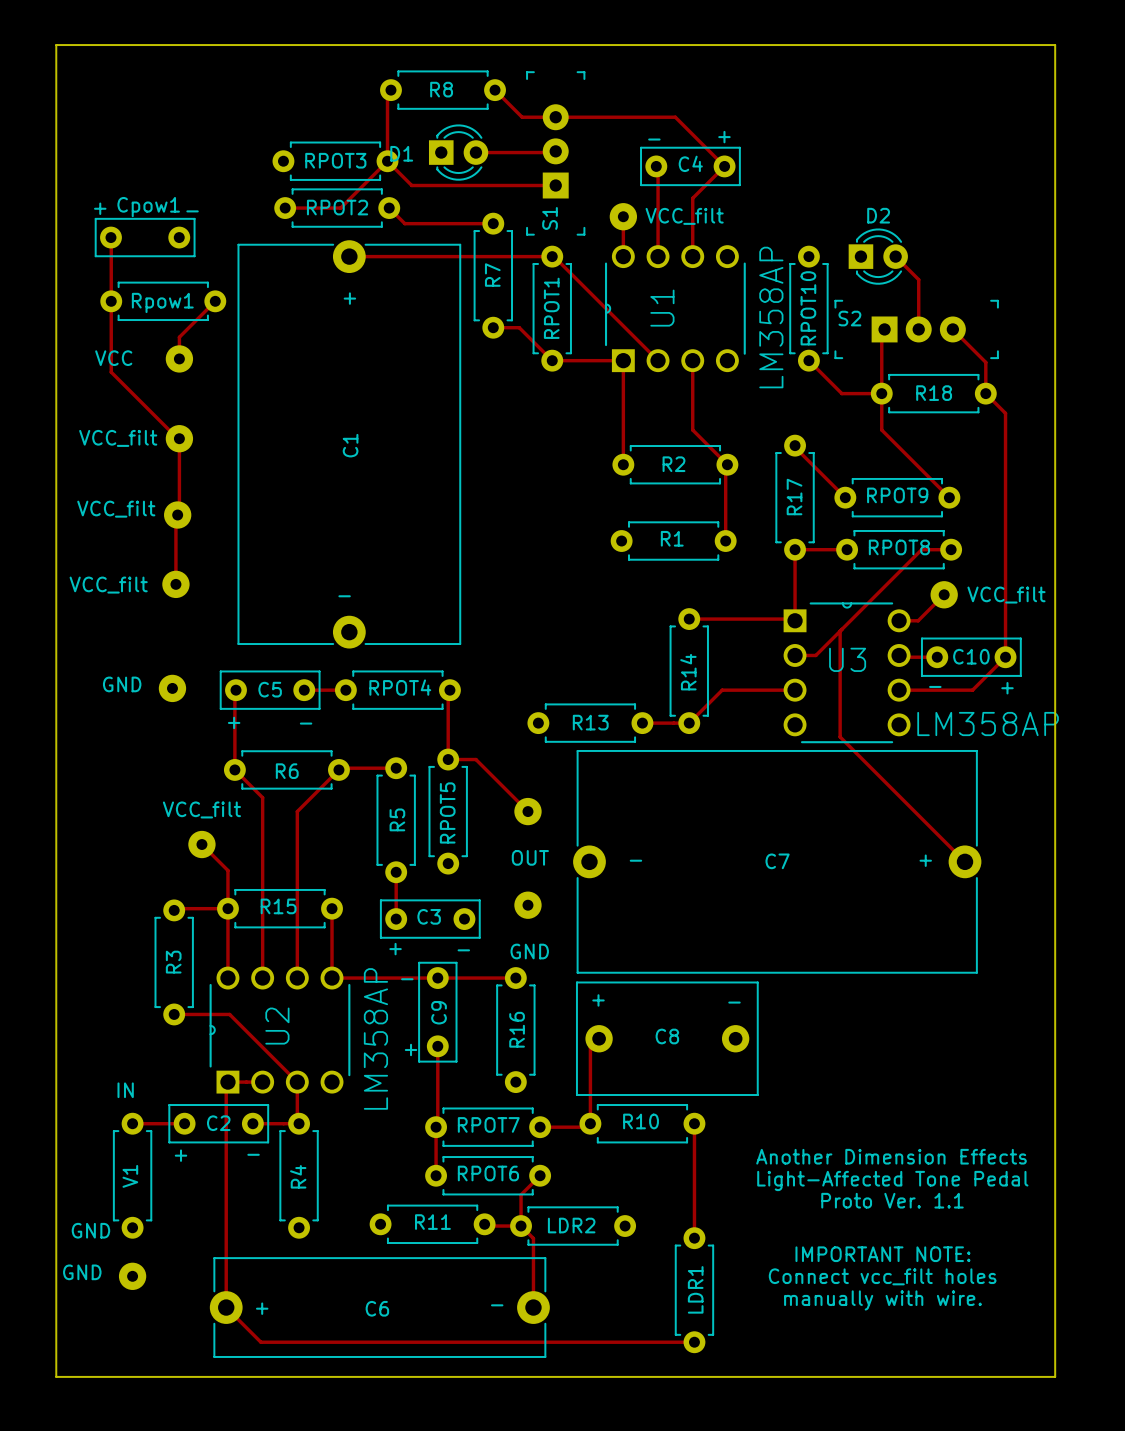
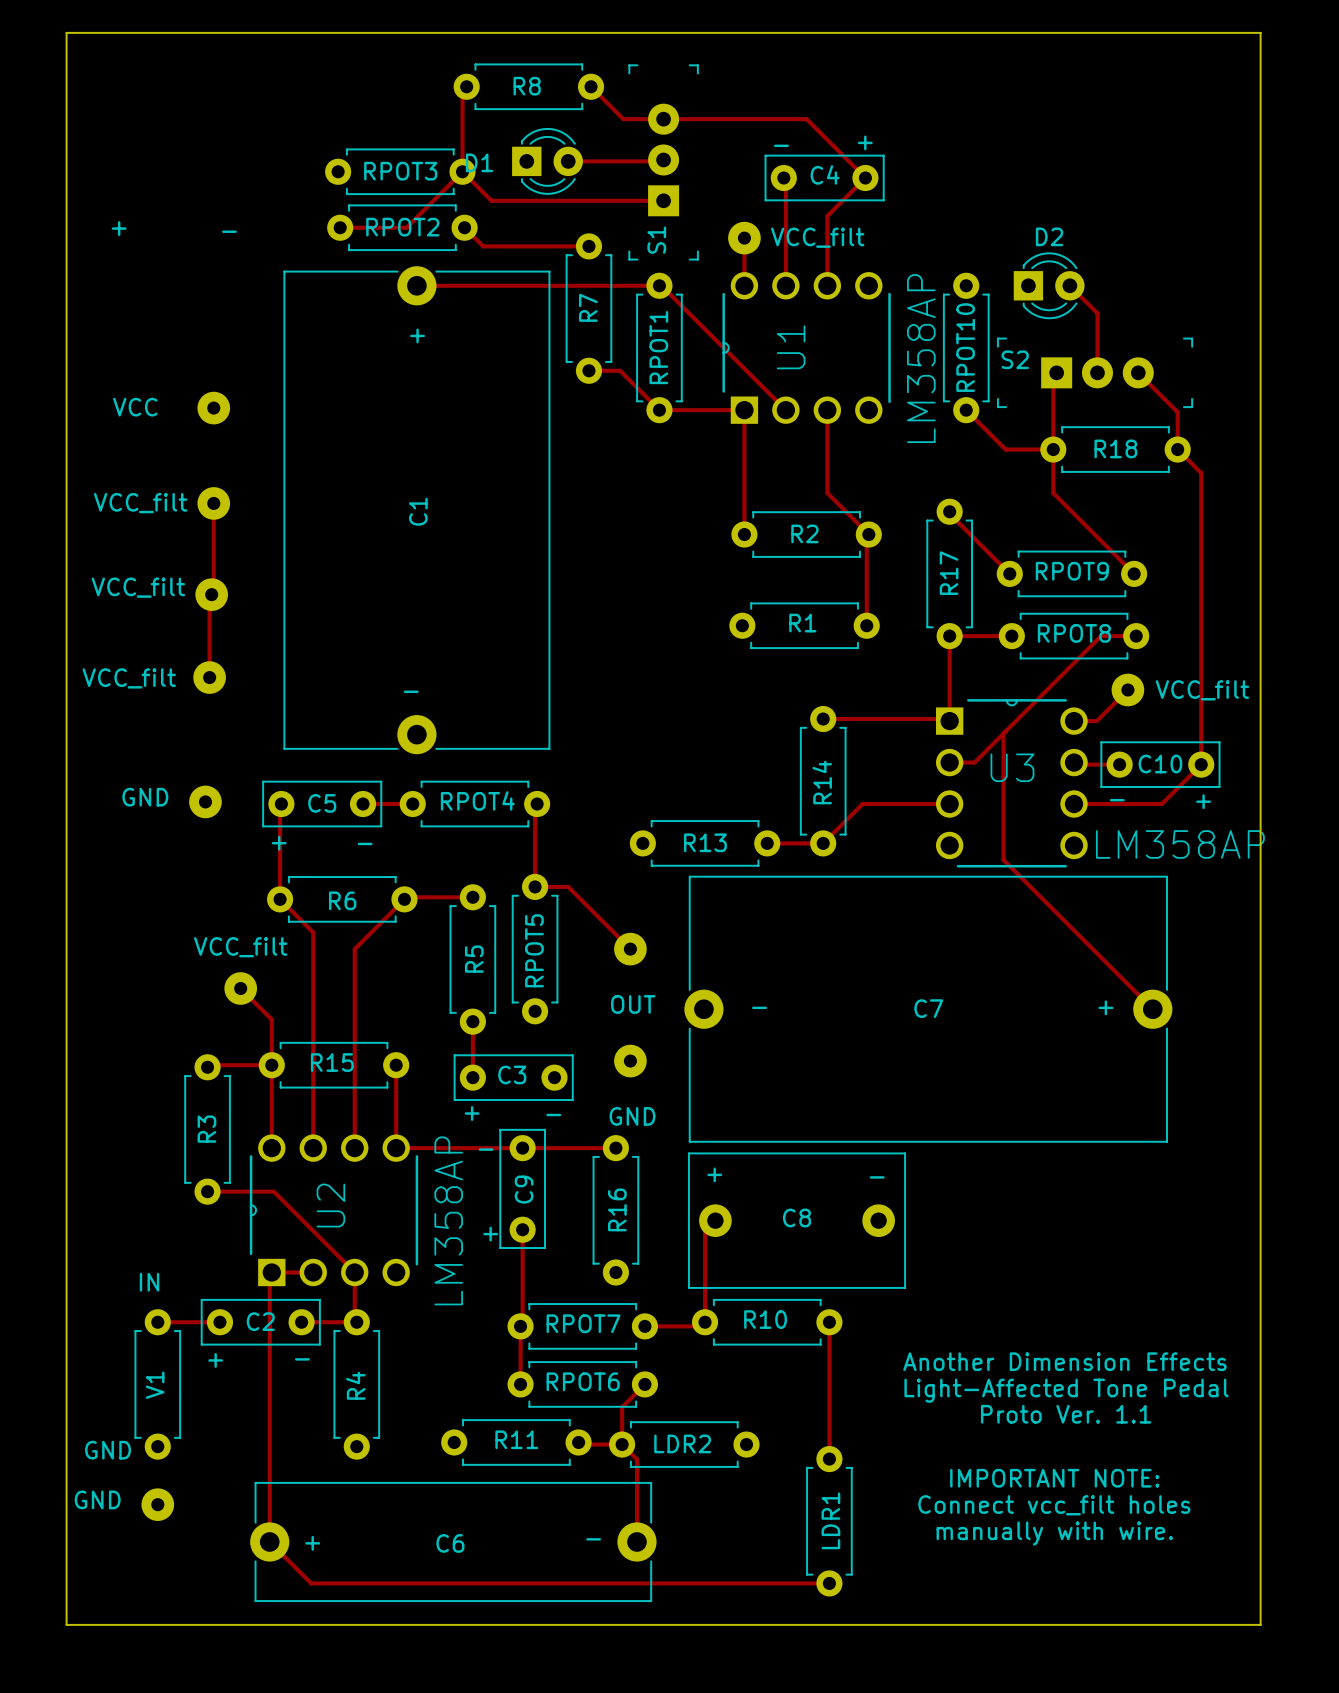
track: (110, 237) (111, 372) (179, 438) -> none
Cpow1: (145, 237) -> none
Rpow1: (163, 301) -> none
track: (215, 301) (179, 337) (179, 358) -> none

